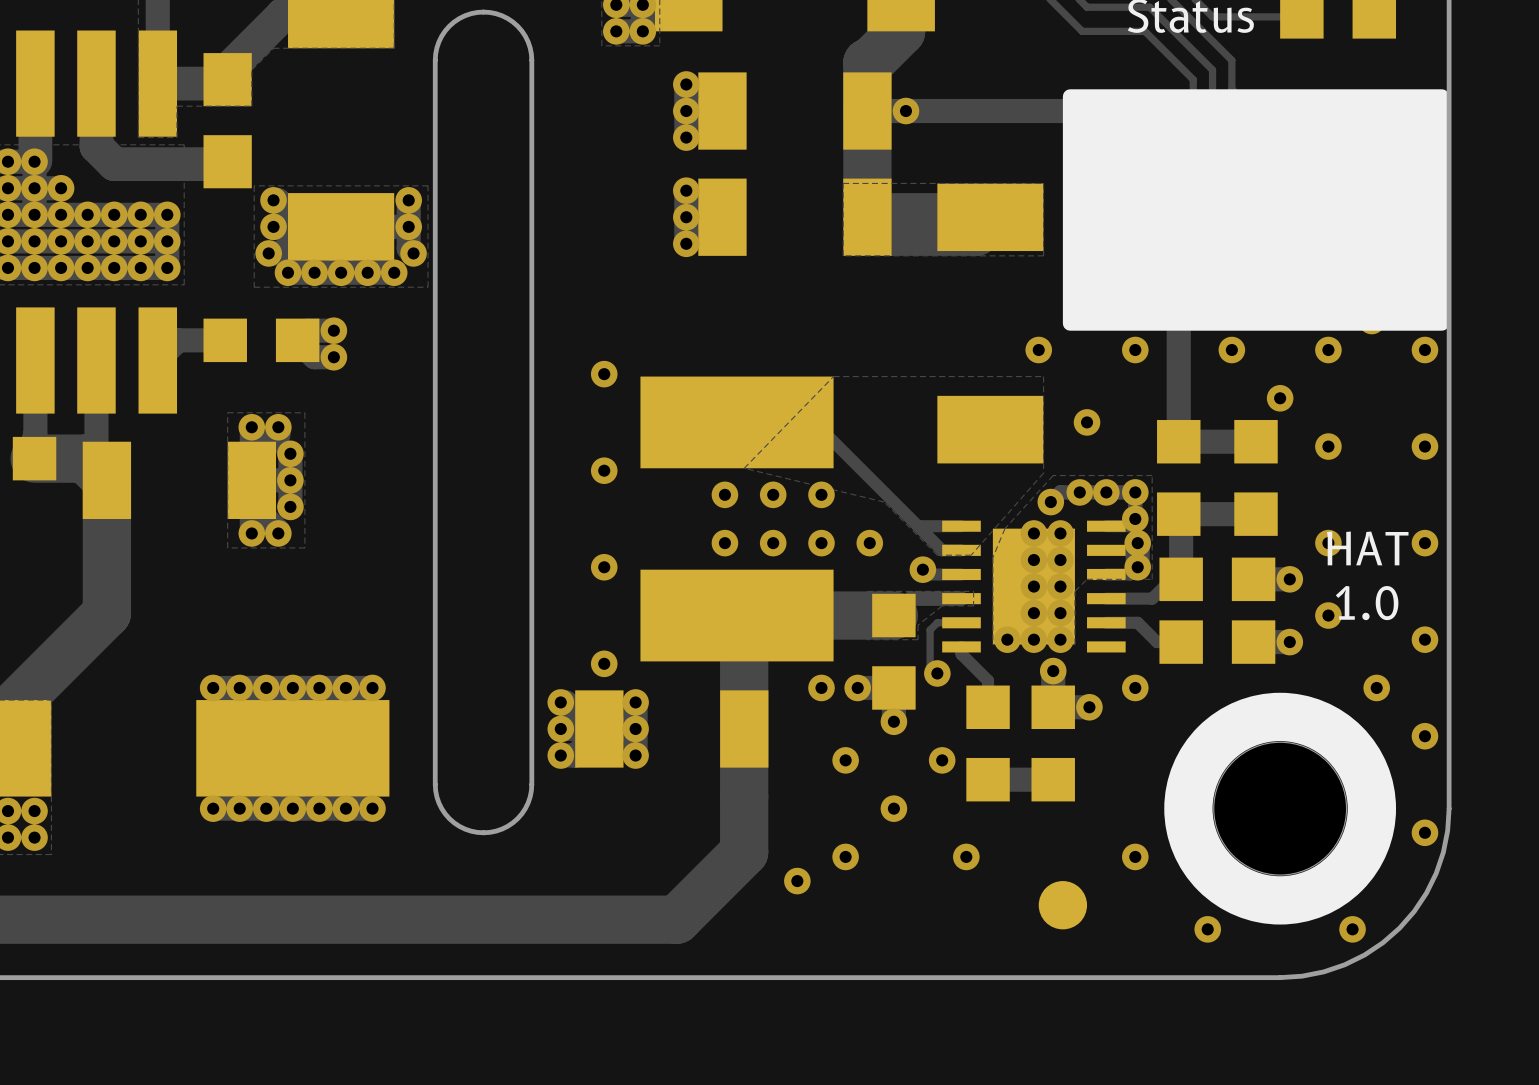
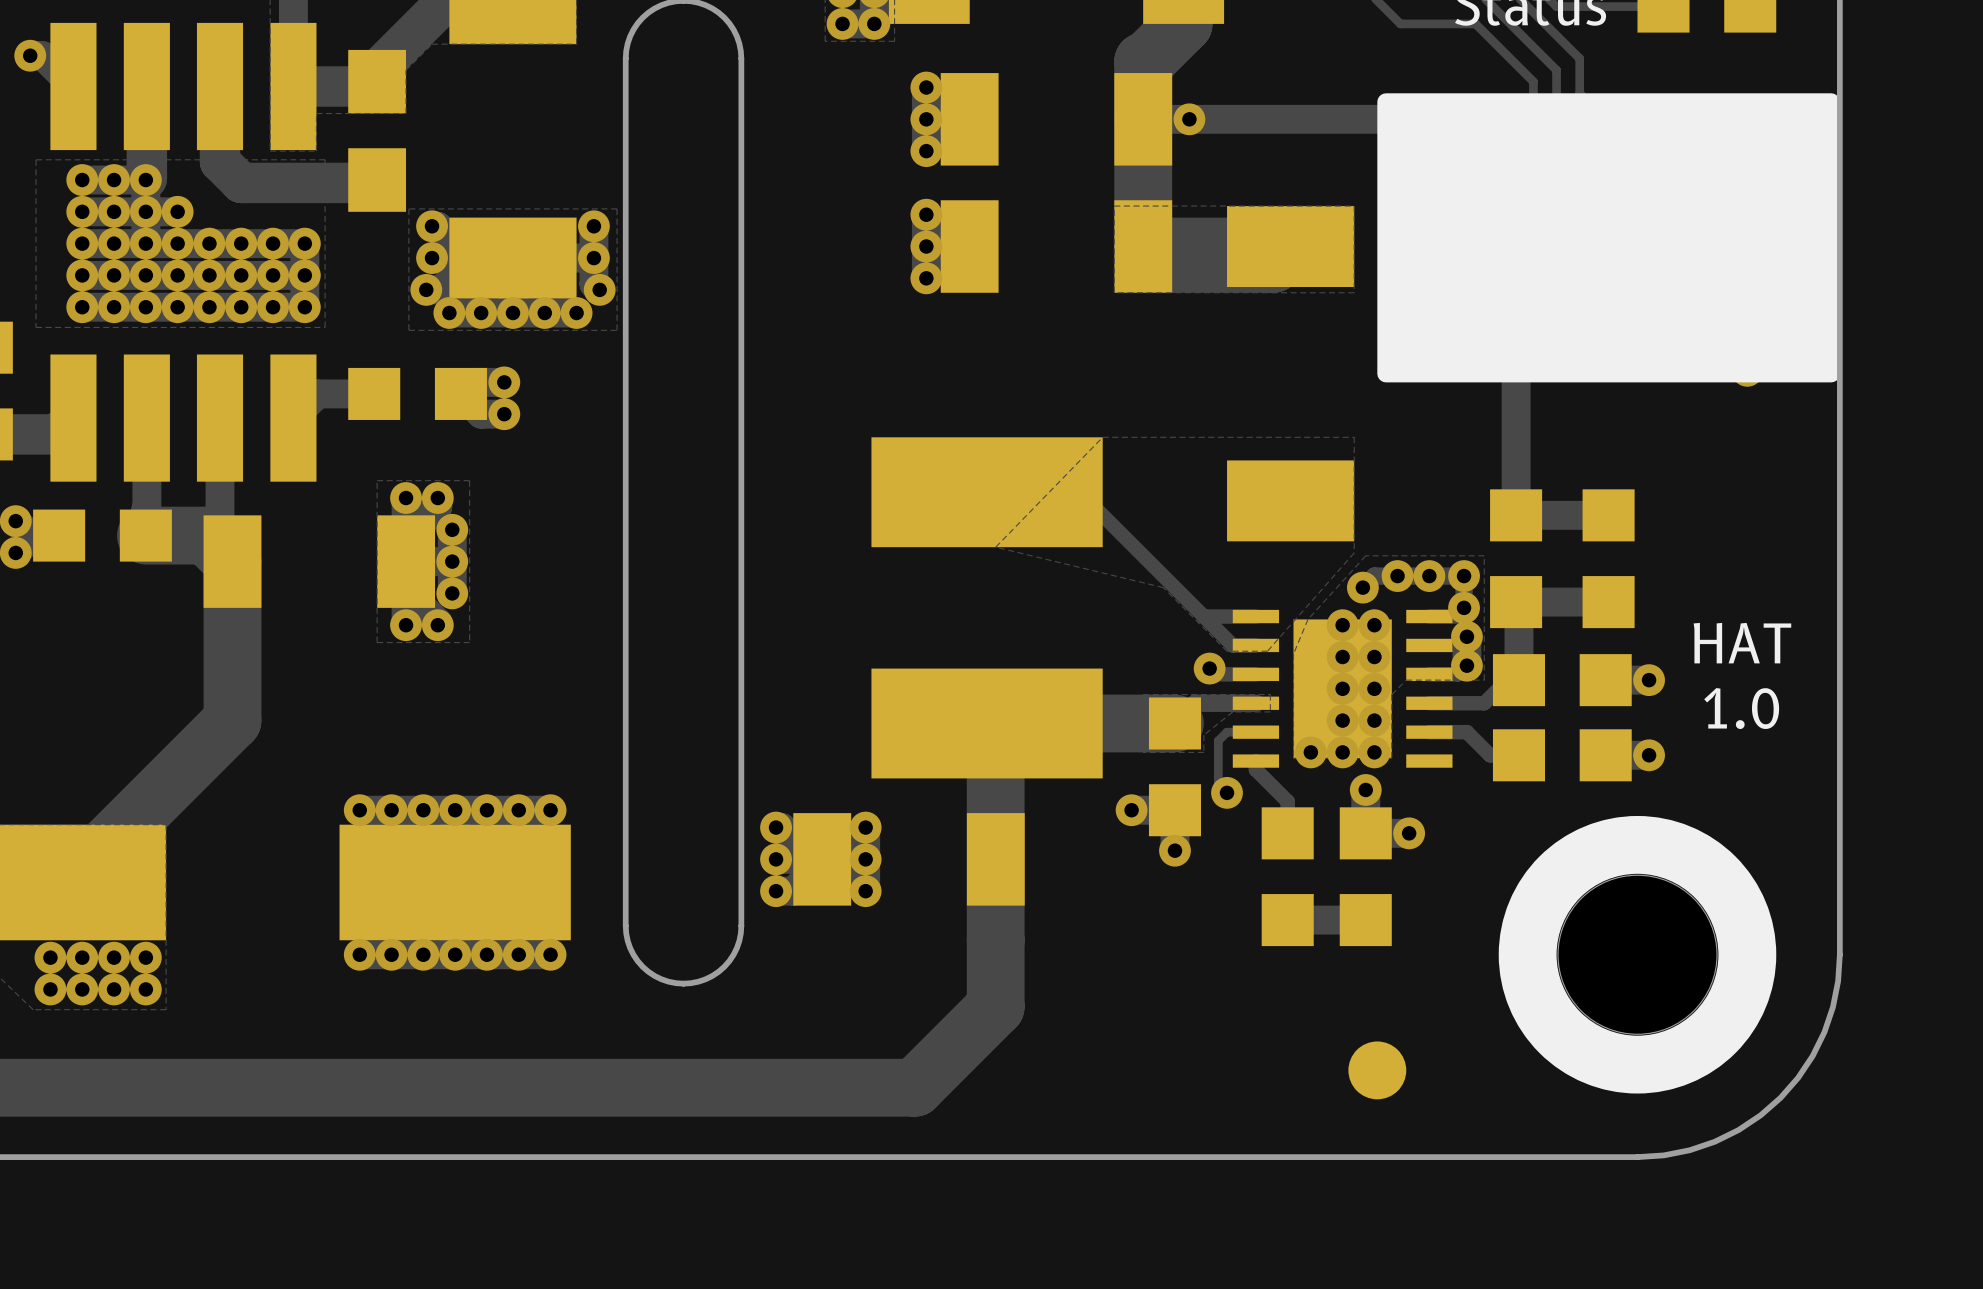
via: (1038, 350) -> none
via: (1135, 350) -> none
via: (1231, 350) -> none
via: (1328, 350) -> none
via: (1424, 350) -> none
via: (604, 374) -> none
via: (1280, 398) -> none
via: (1087, 422) -> none
via: (1328, 446) -> none
via: (1424, 446) -> none
via: (604, 470) -> none
via: (724, 494) -> none
via: (773, 494) -> none
via: (821, 494) -> none
via: (724, 543) -> none
via: (773, 543) -> none
via: (821, 543) -> none
via: (869, 543) -> none
via: (1328, 543) -> none
via: (1424, 543) -> none
via: (604, 567) -> none
via: (1328, 615) -> none
via: (1424, 639) -> none
via: (604, 663) -> none
via: (821, 687) -> none
via: (1135, 687) -> none
via: (1376, 687) -> none
via: (1424, 736) -> none
via: (845, 760) -> none
via: (942, 760) -> none
via: (893, 808) -> none
via: (1424, 832) -> none
via: (845, 856) -> none
via: (966, 856) -> none
via: (1135, 856) -> none
via: (797, 881) -> none
via: (1207, 929) -> none
via: (1352, 929) -> none

